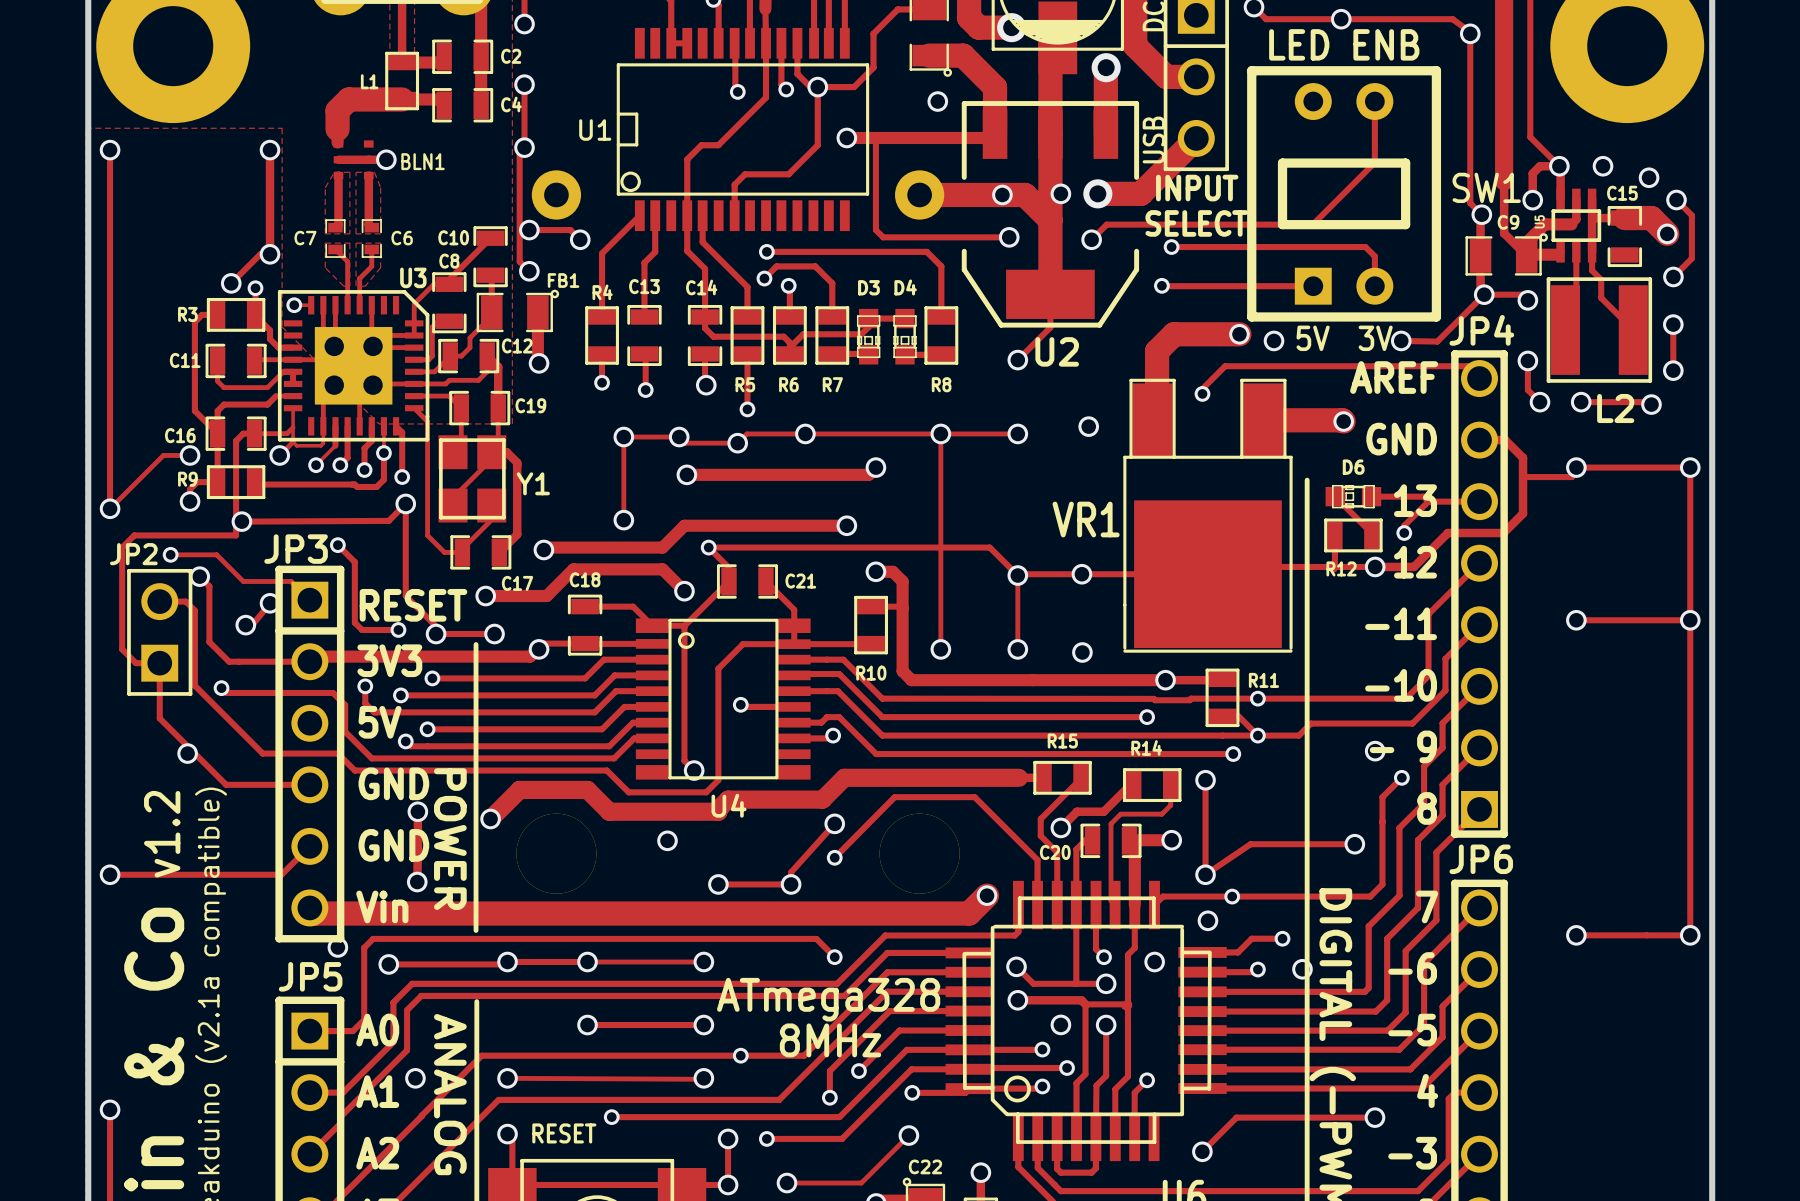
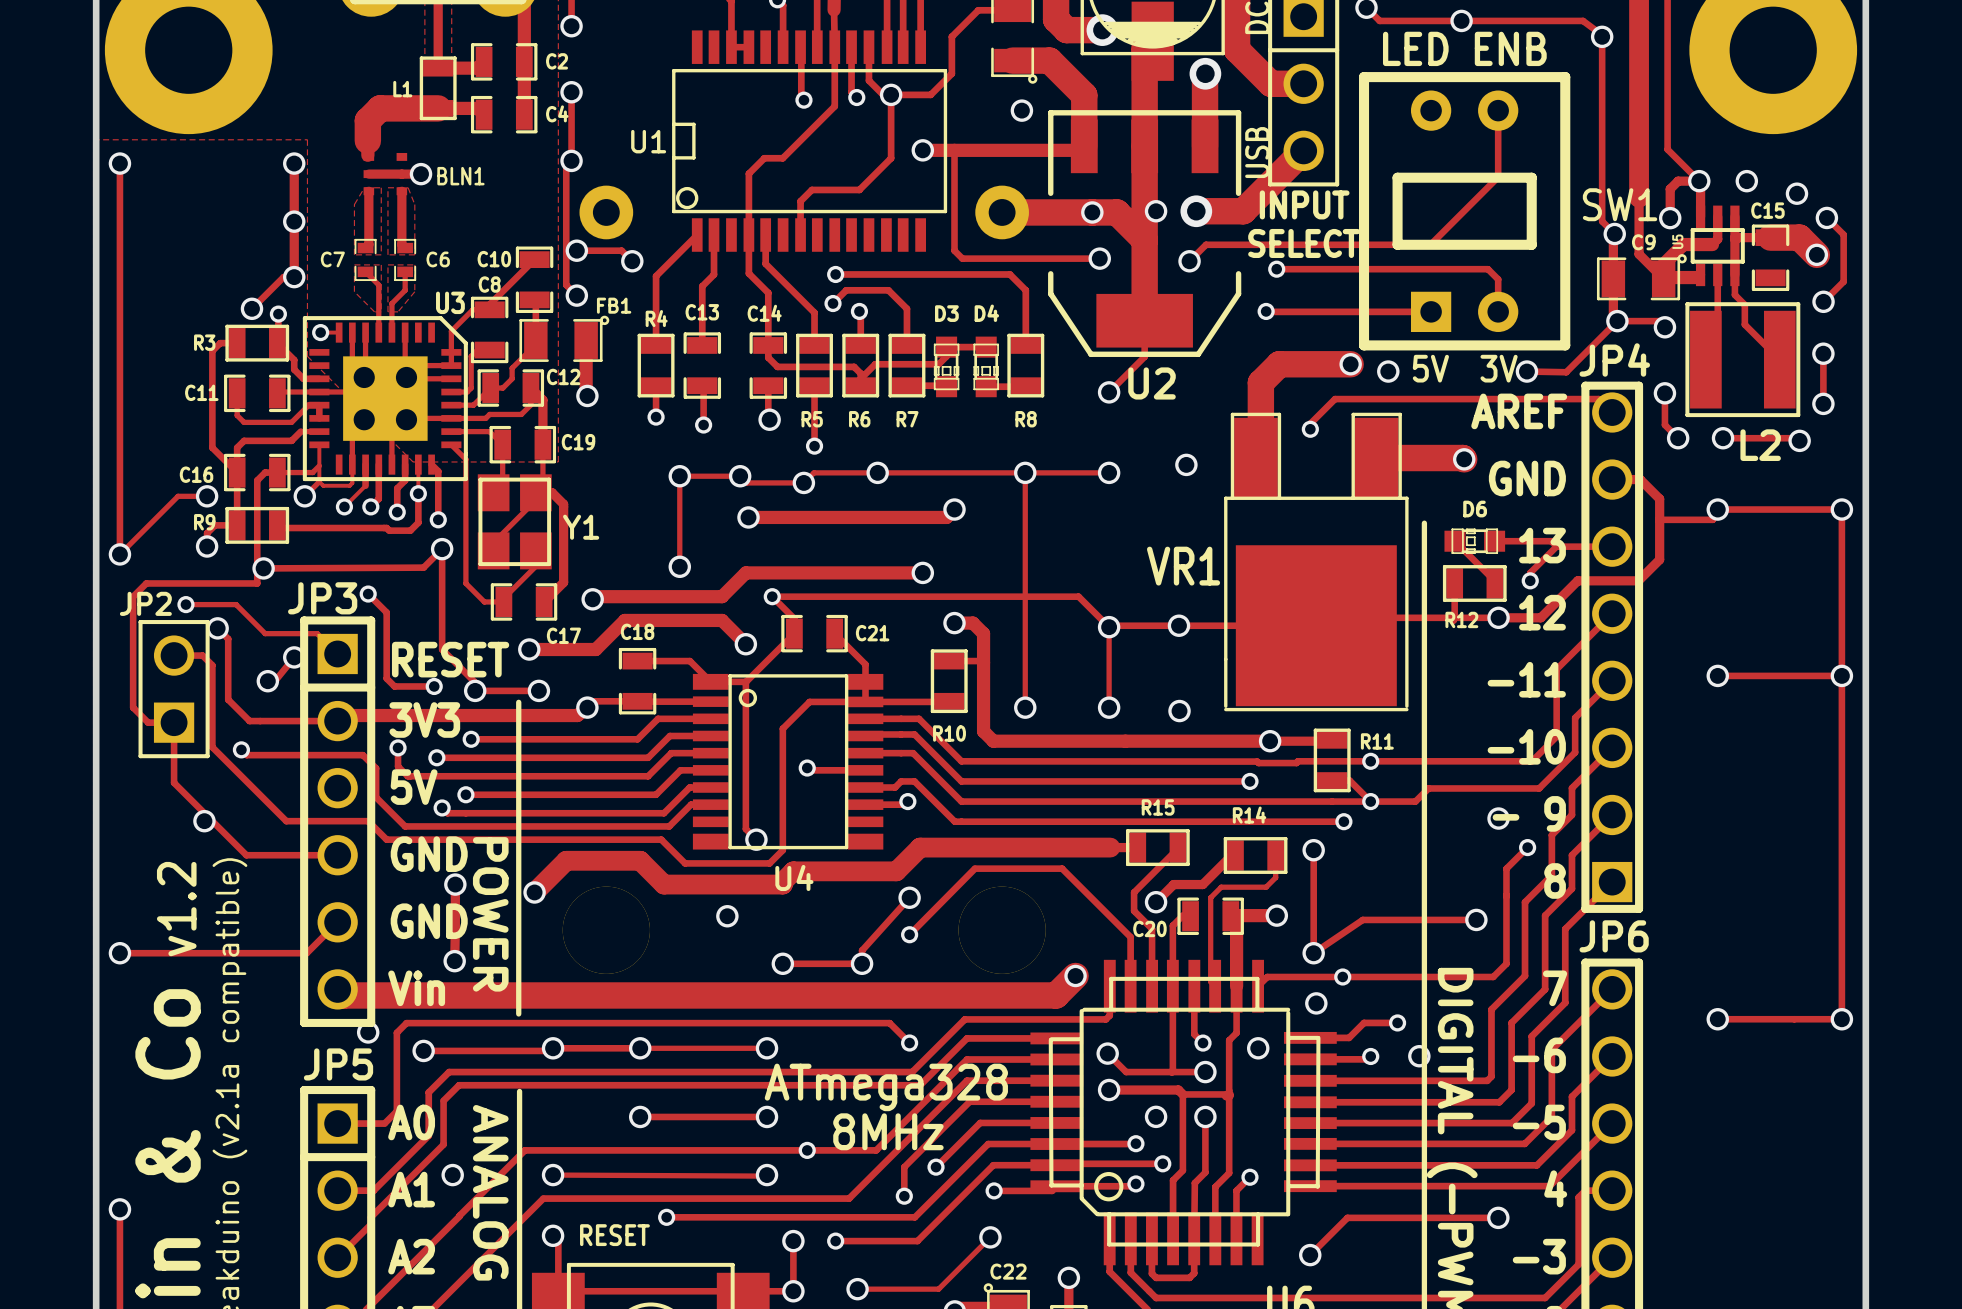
via: none -> (294, 221)
text position: ATmega328 (828, 999) -> ATmega328 (886, 1087)
text position: 8MHz (830, 1040) -> 8MHz (888, 1131)

